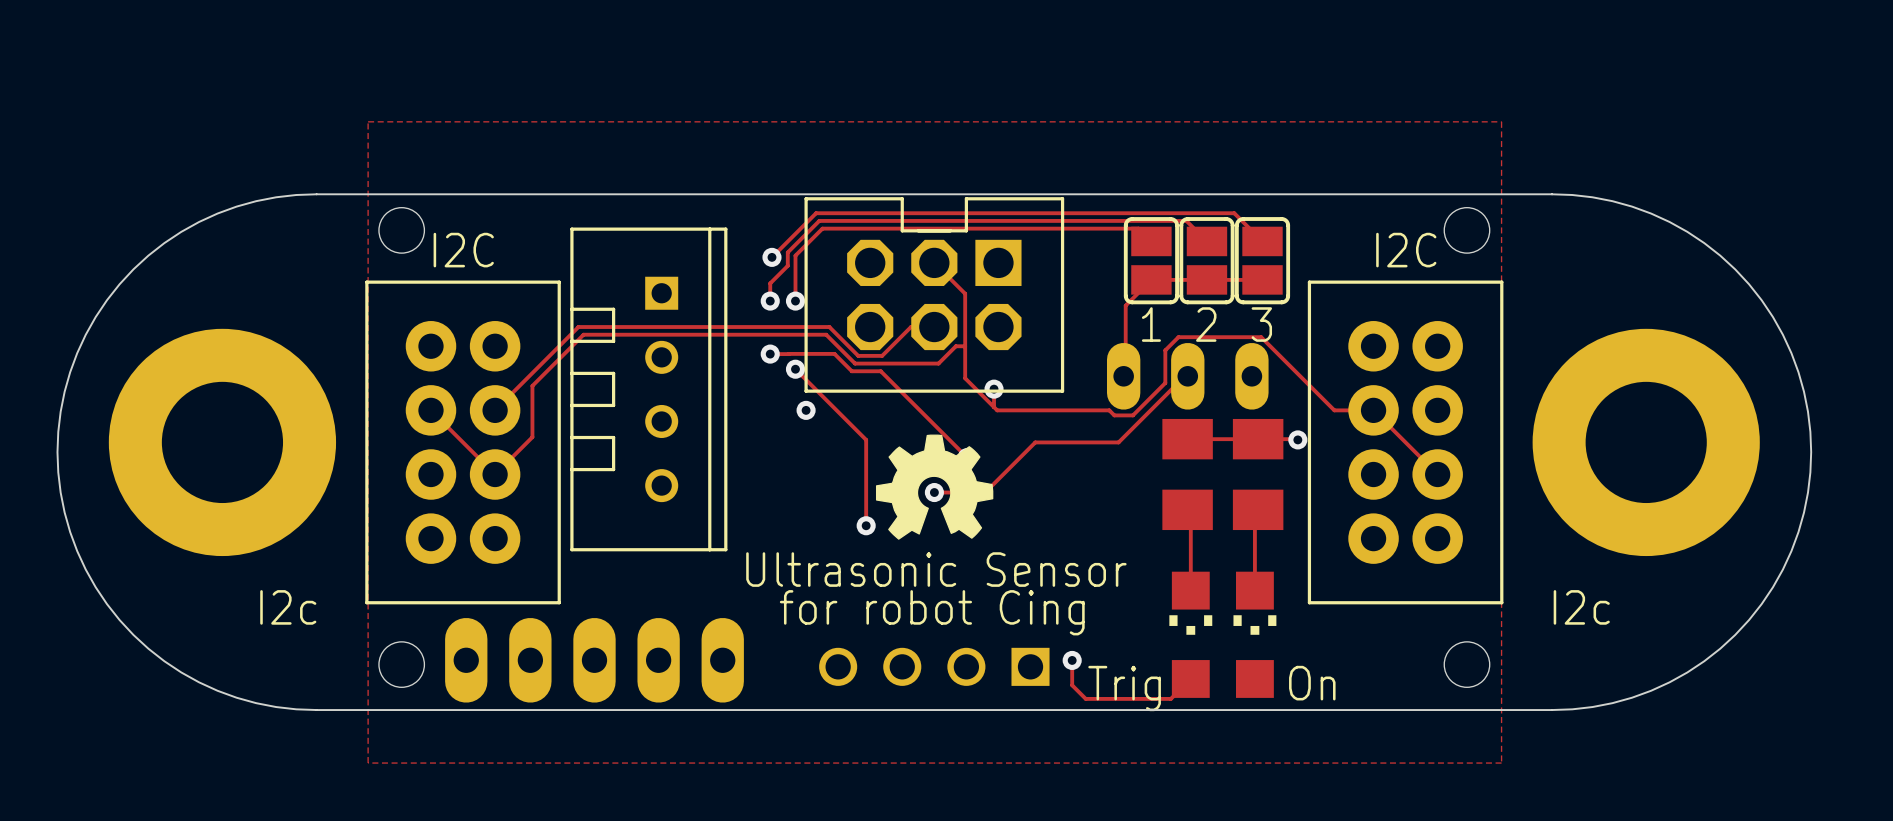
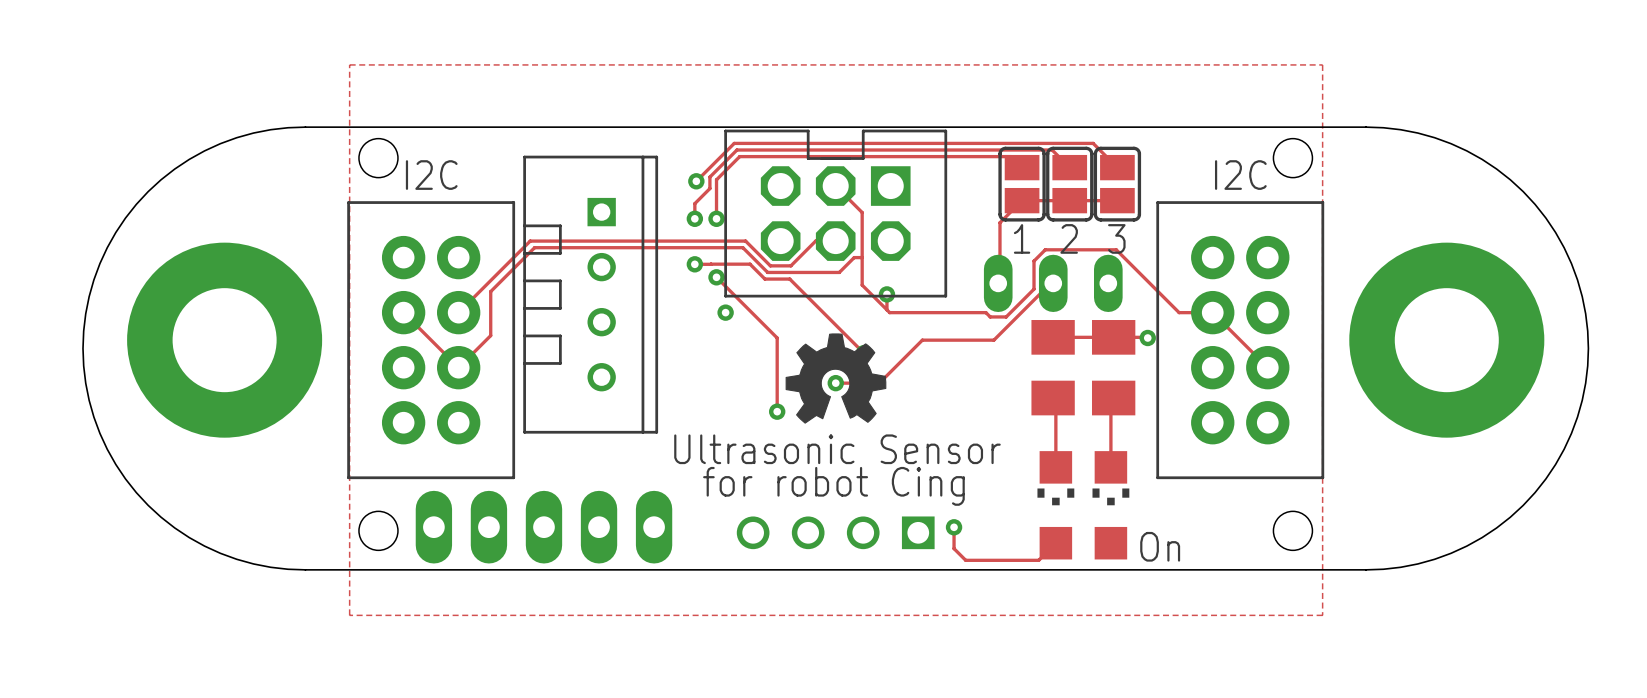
text: I2c (288, 607) -> none
text: I2c (1581, 607) -> none
text: Trig (1124, 688) -> none

